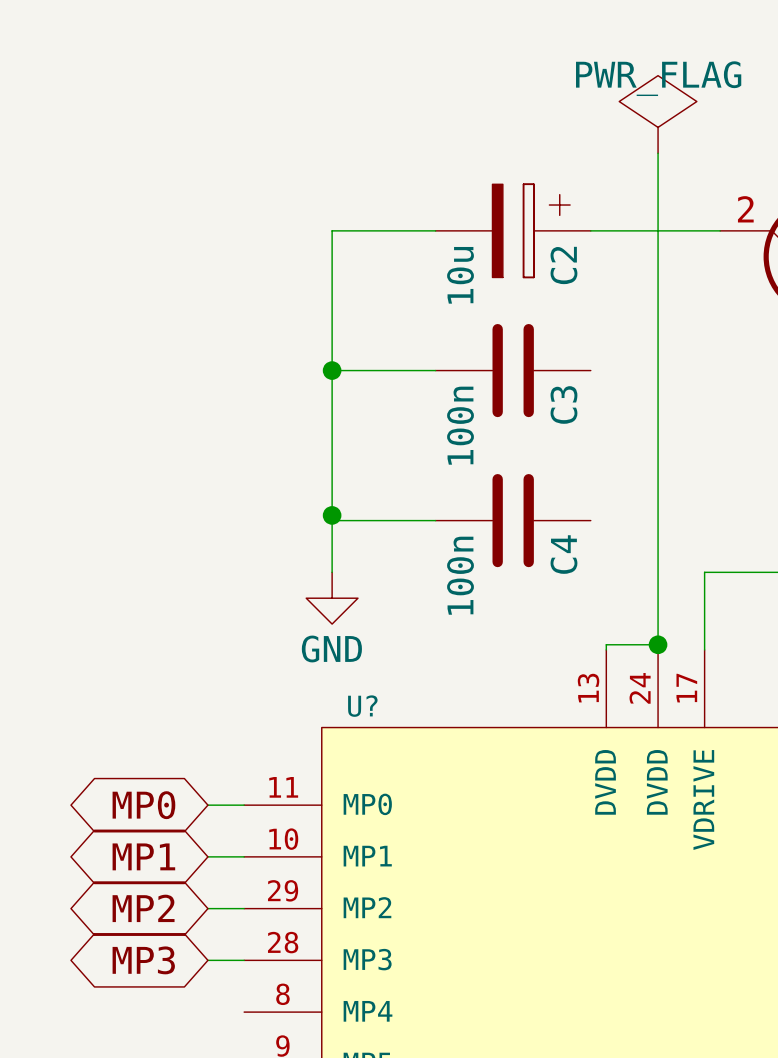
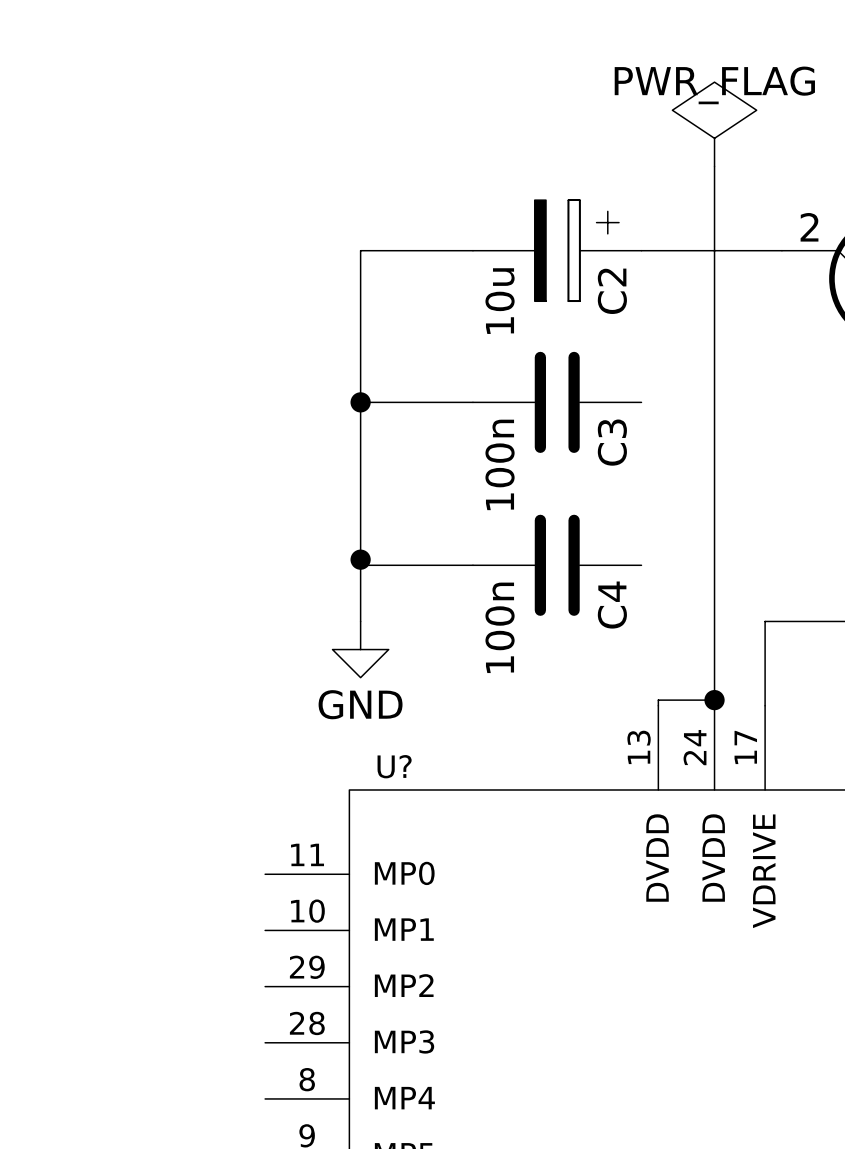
global label: MP0 (143, 805) -> none
wire: (207, 805) (244, 805) -> none
global label: MP1 (143, 856) -> none
wire: (207, 856) (244, 856) -> none
global label: MP2 (143, 908) -> none
wire: (207, 908) (244, 908) -> none
global label: MP3 (143, 960) -> none
wire: (207, 960) (244, 960) -> none

